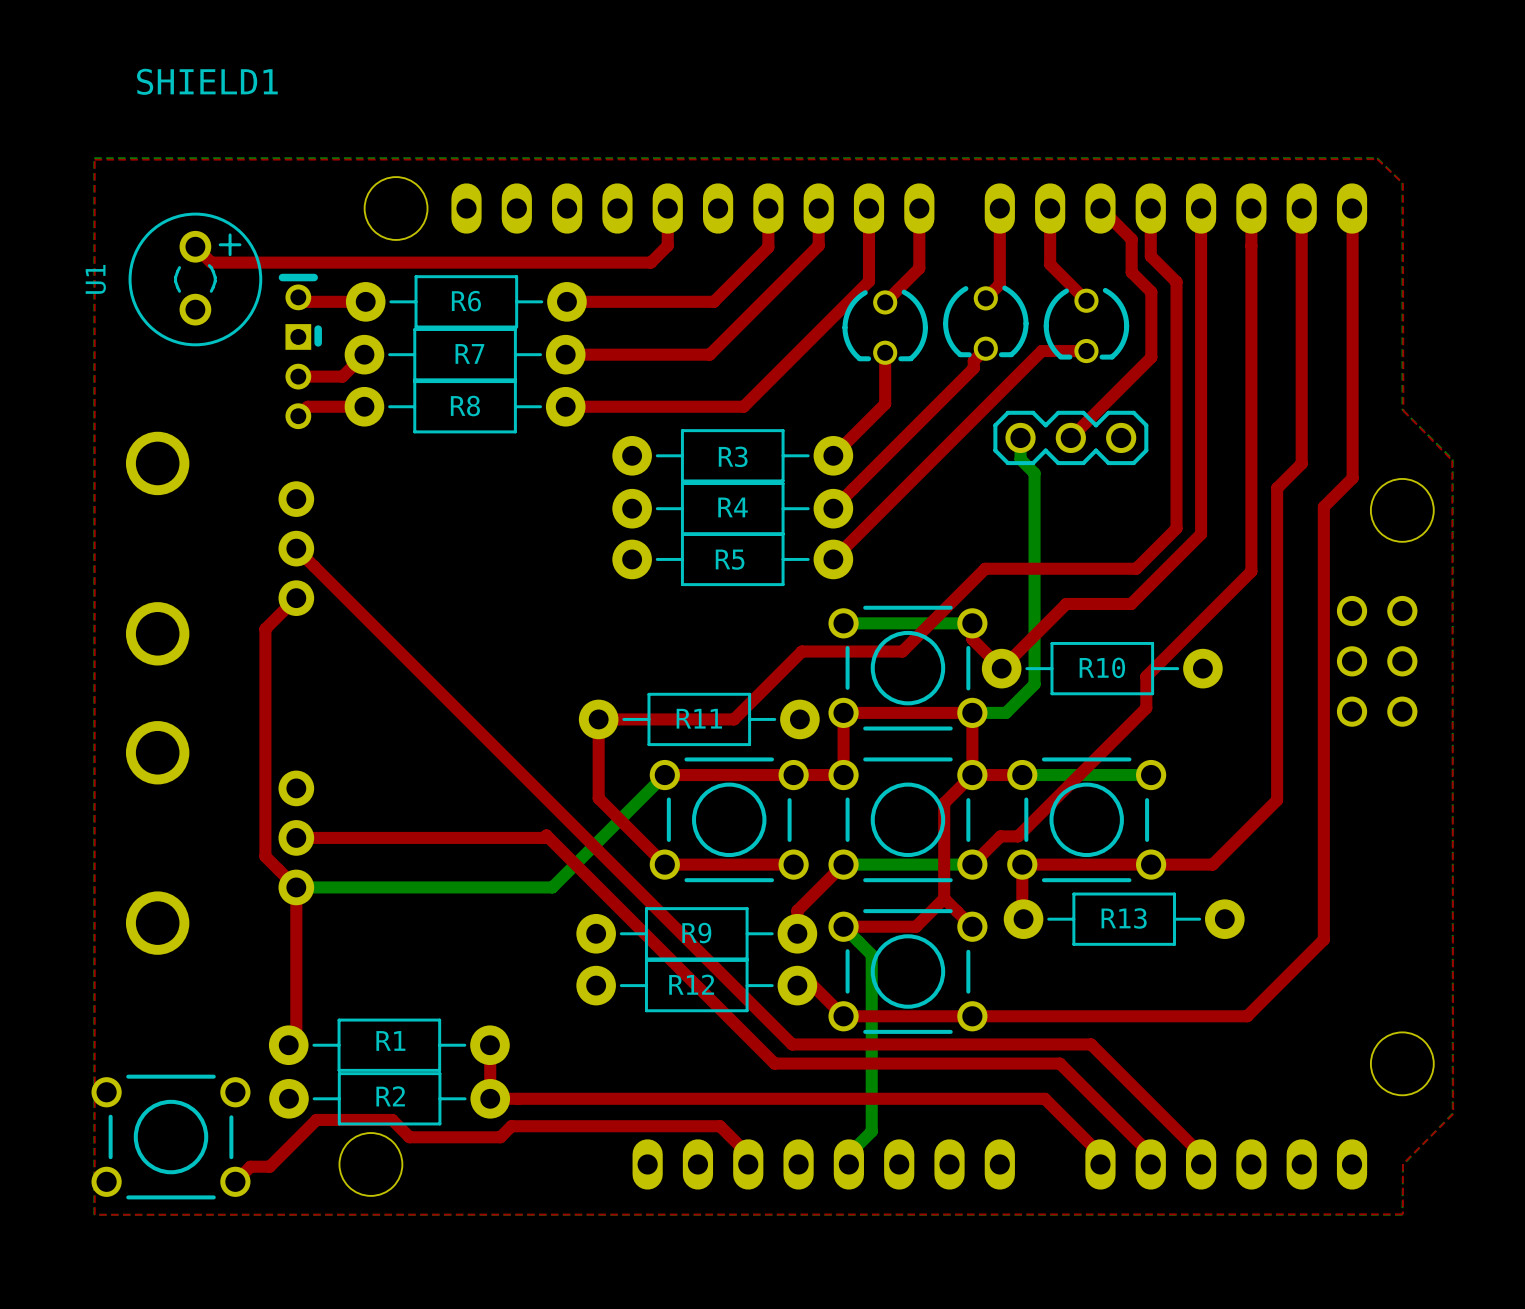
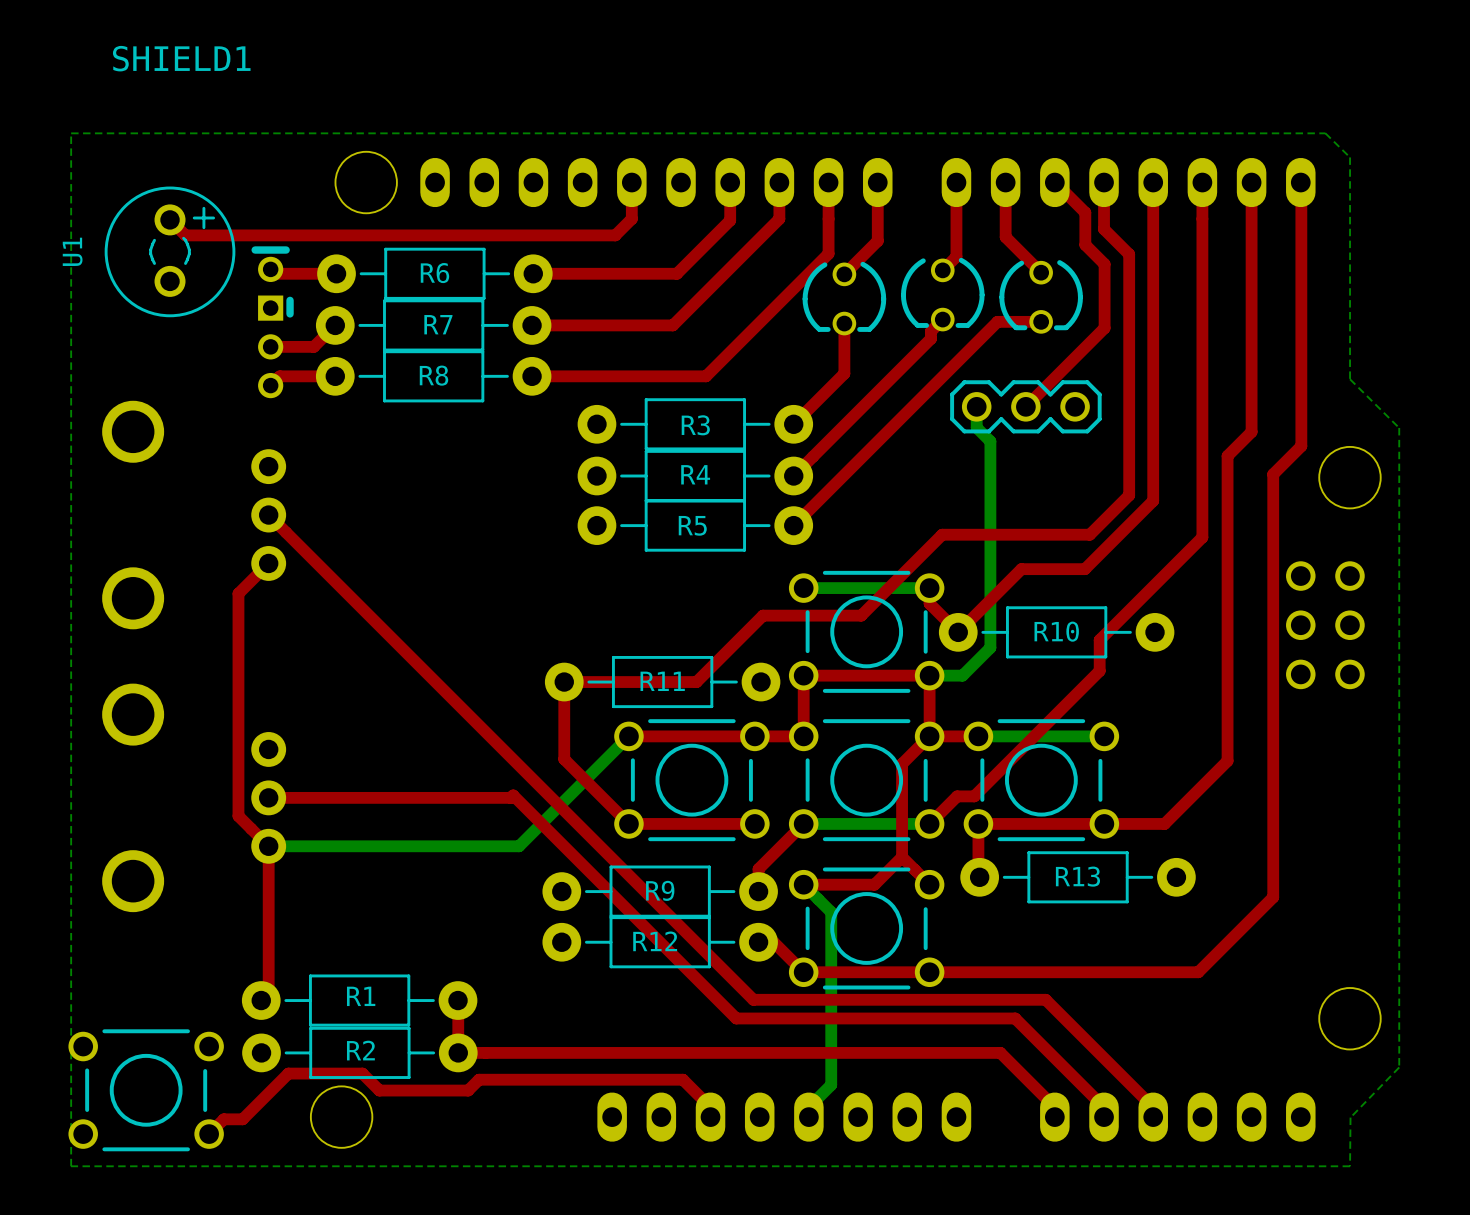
top zone outline: (1377, 159) (94, 159) (94, 1214) (1402, 1214) (1402, 1163) (1453, 1114) (1452, 460) (1403, 410) (1402, 183) (1377, 159) -> none

